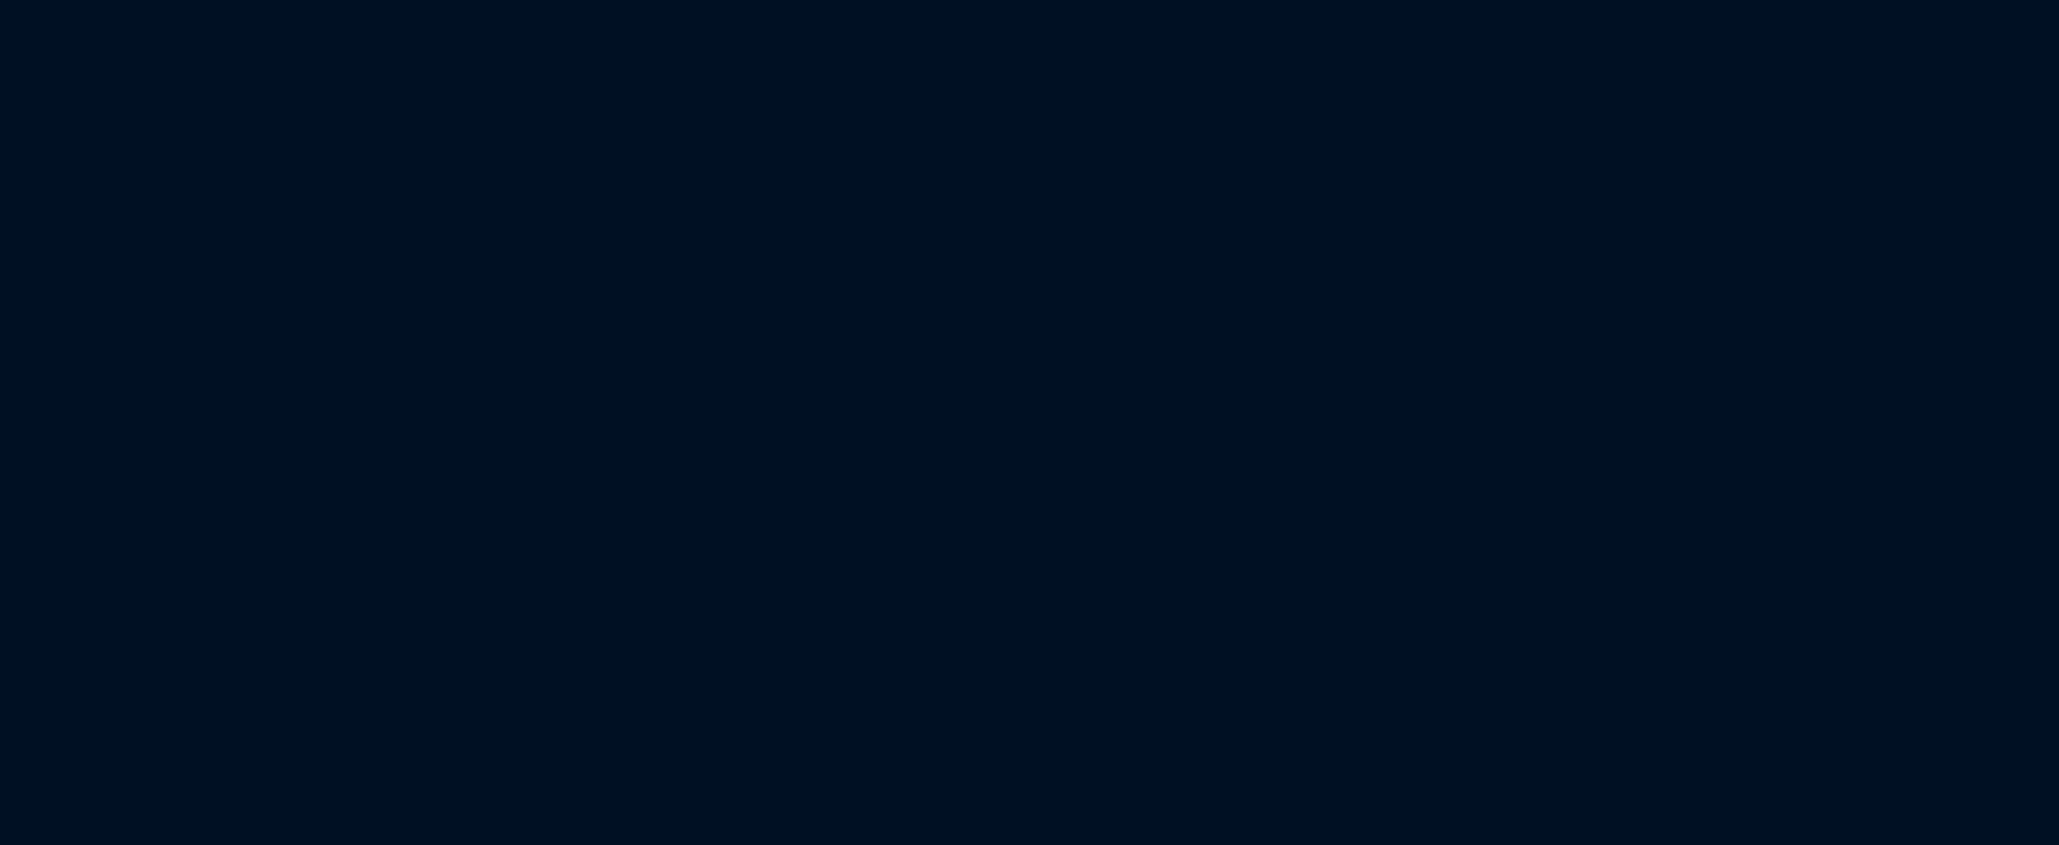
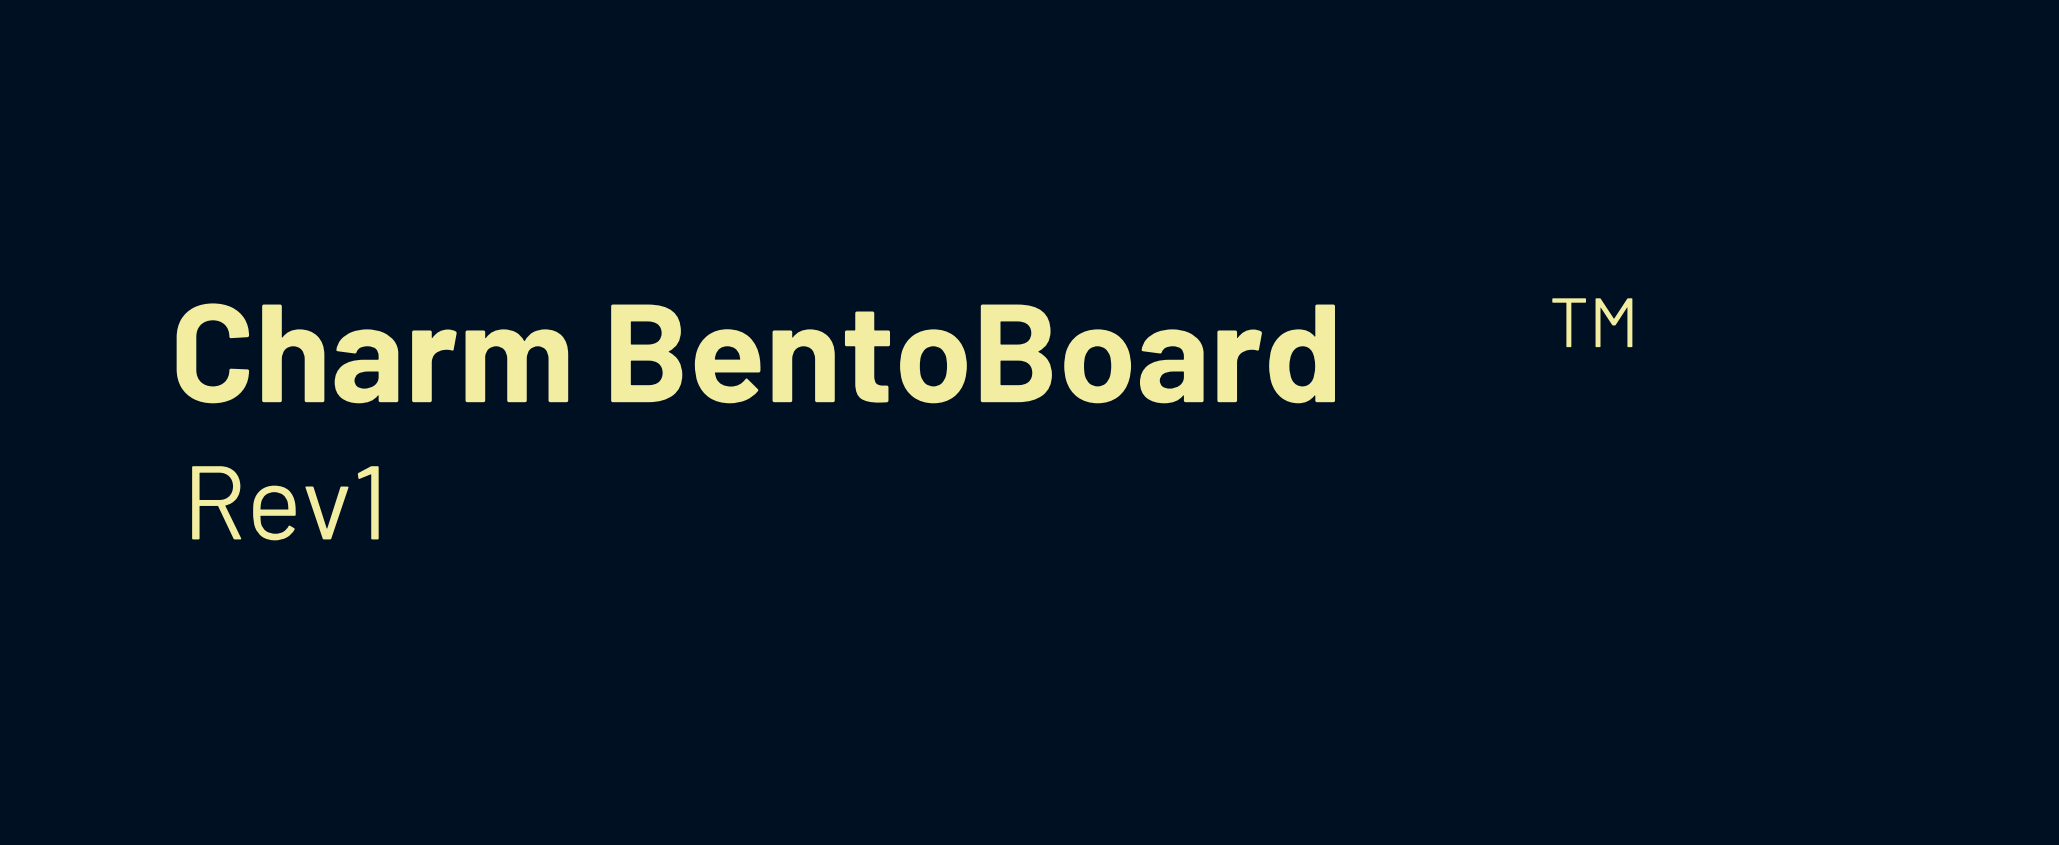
text: none -> TM (1592, 322)
text: none -> Charm BentoBoard (755, 353)
text: none -> Rev1 (285, 503)

